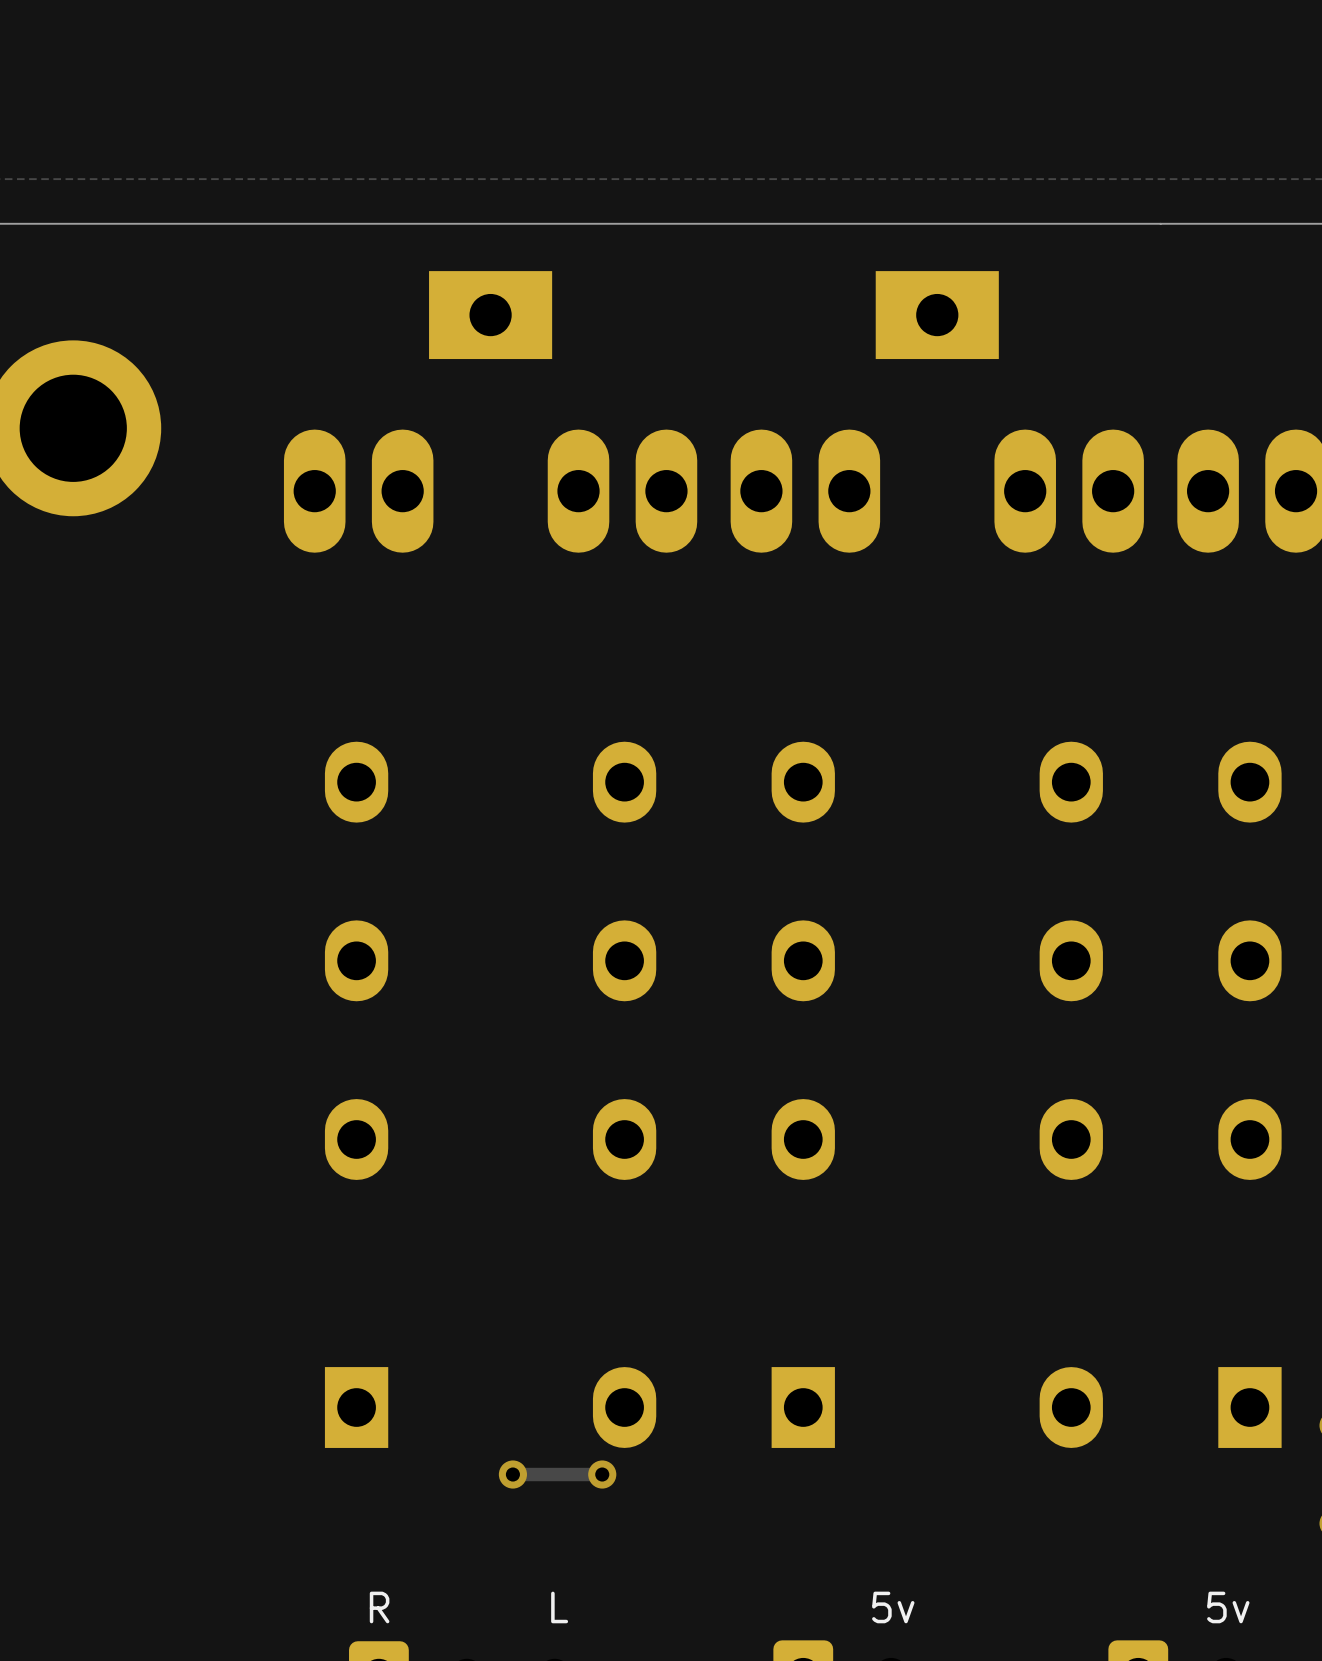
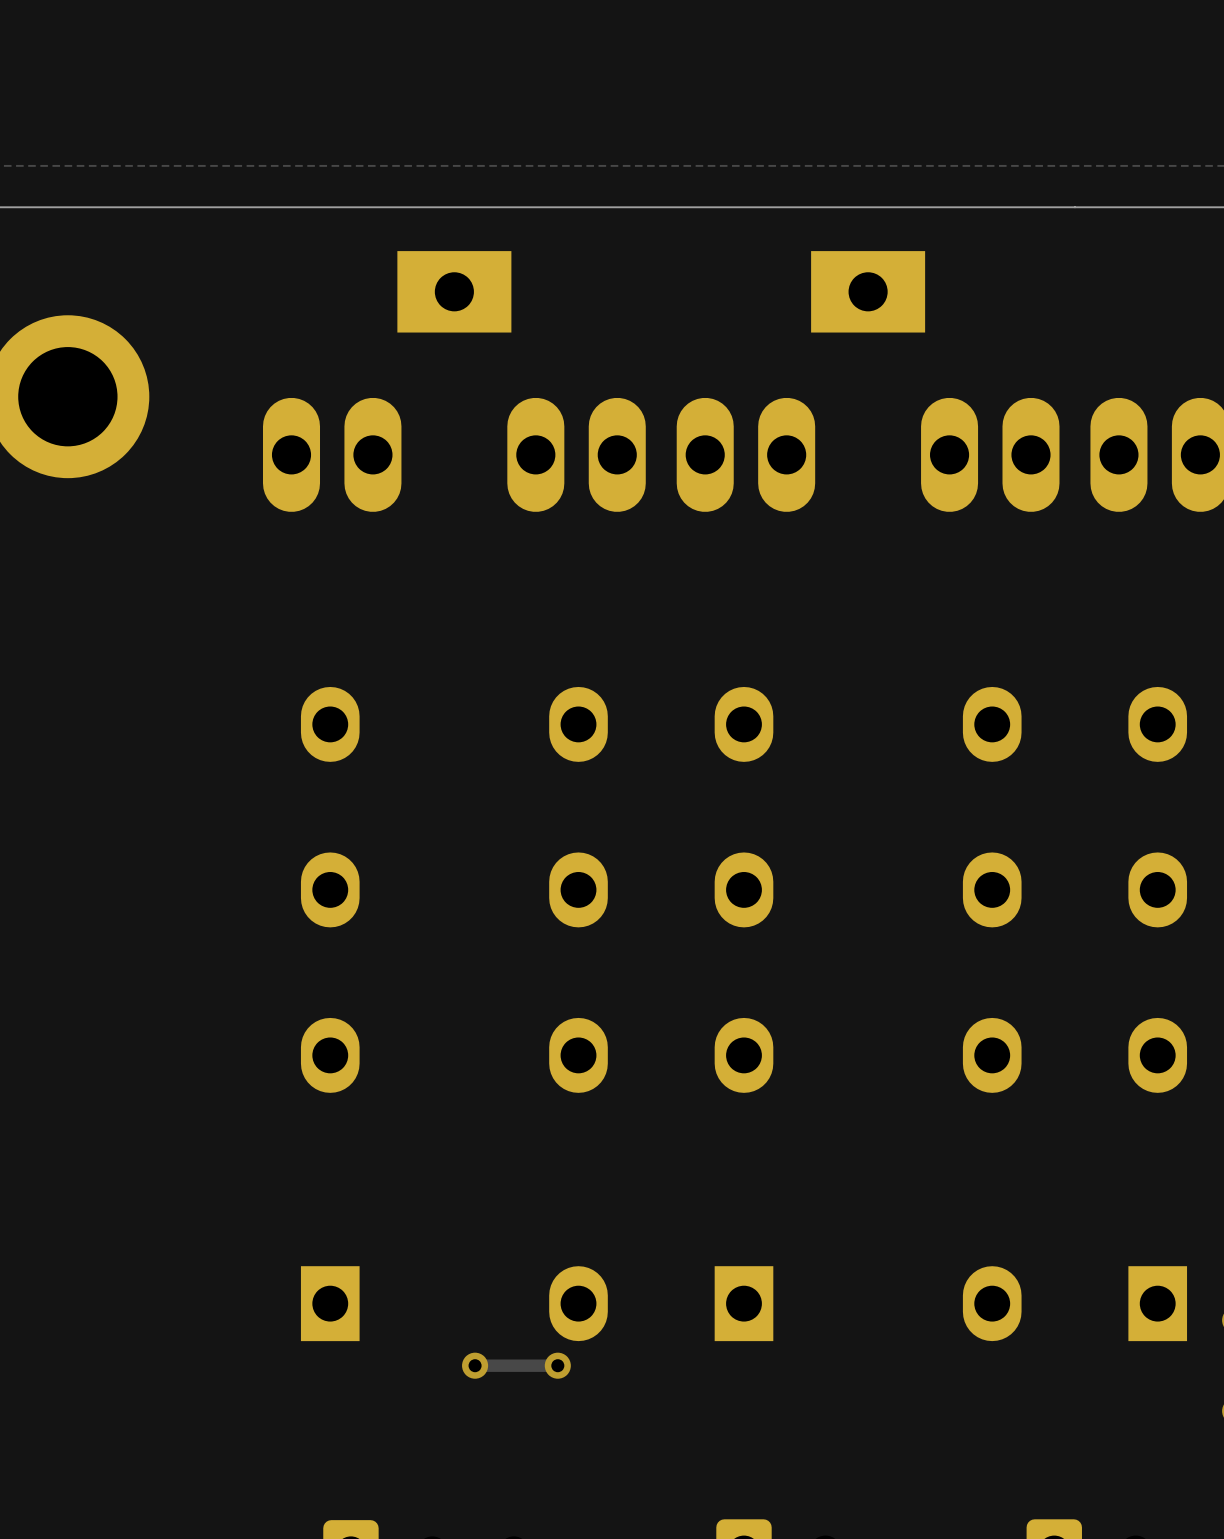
text: R (379, 1607) -> none
text: L (559, 1607) -> none
text: 5v (893, 1607) -> none
text: 5v (1228, 1607) -> none

